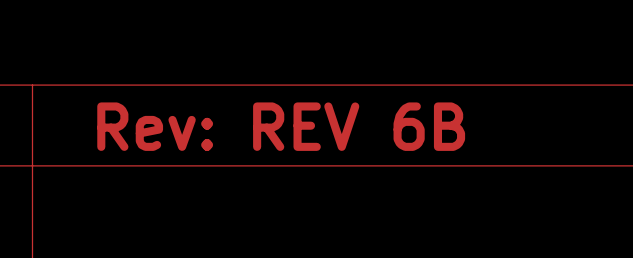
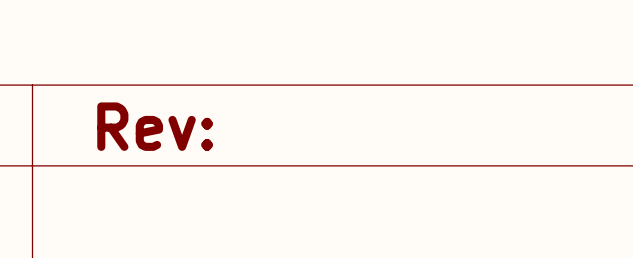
title block: Rev: REV 6B (281, 126) -> Rev: (155, 126)

